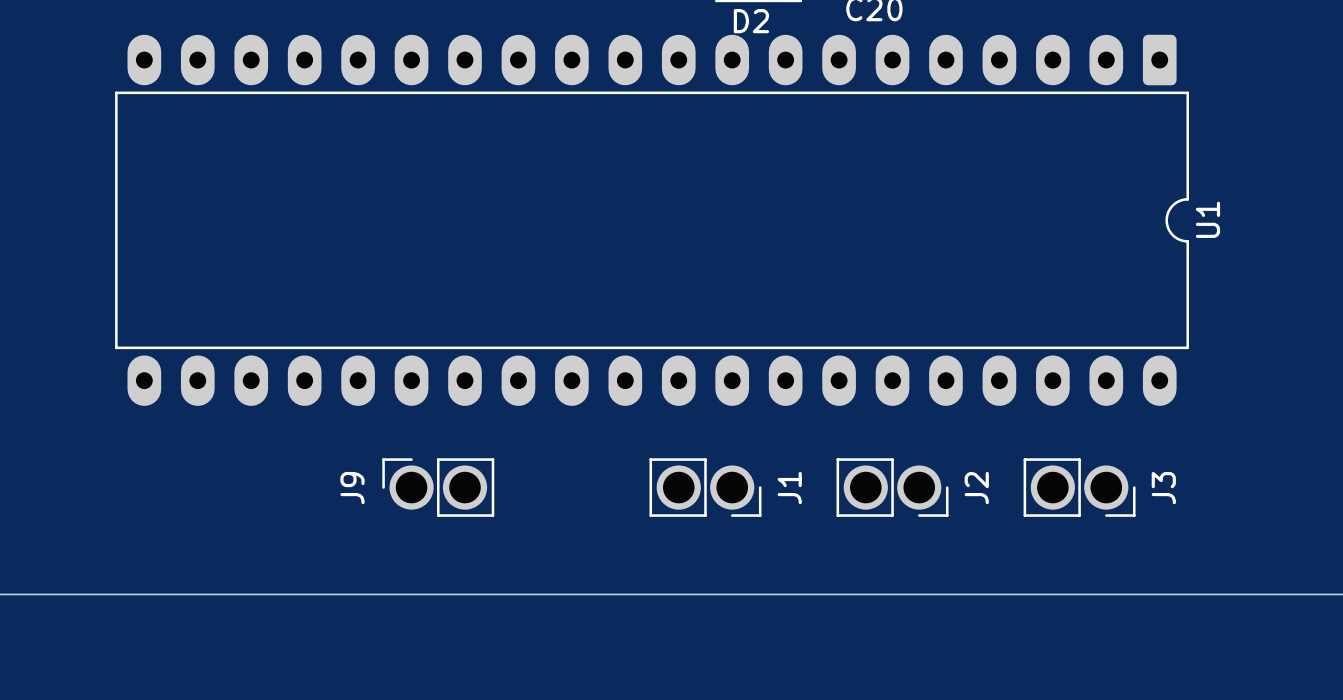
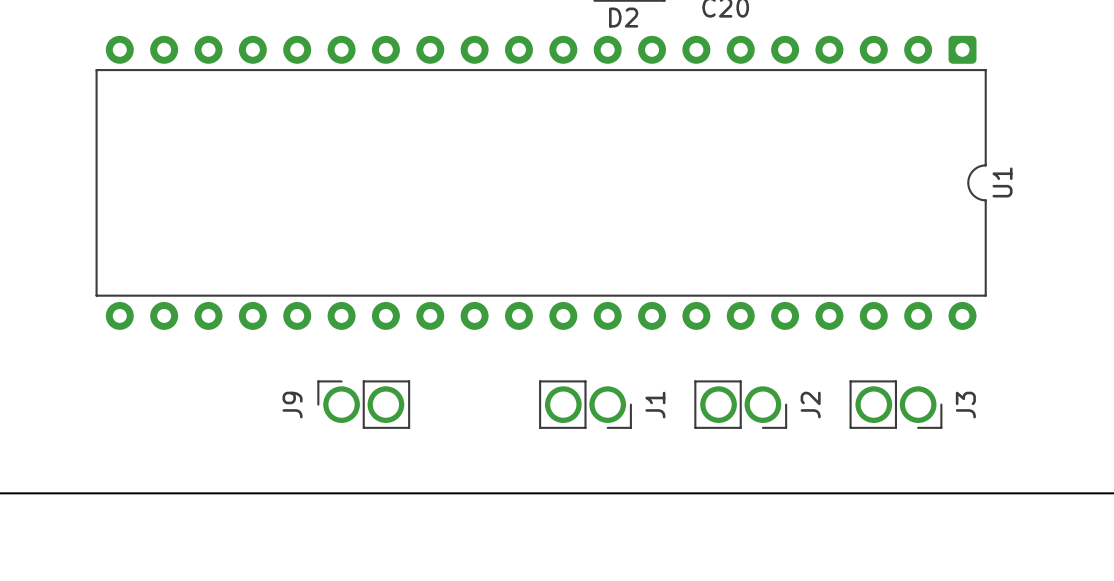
U1 footprint: [115, 34, 1189, 406] -> [95, 35, 987, 330]

